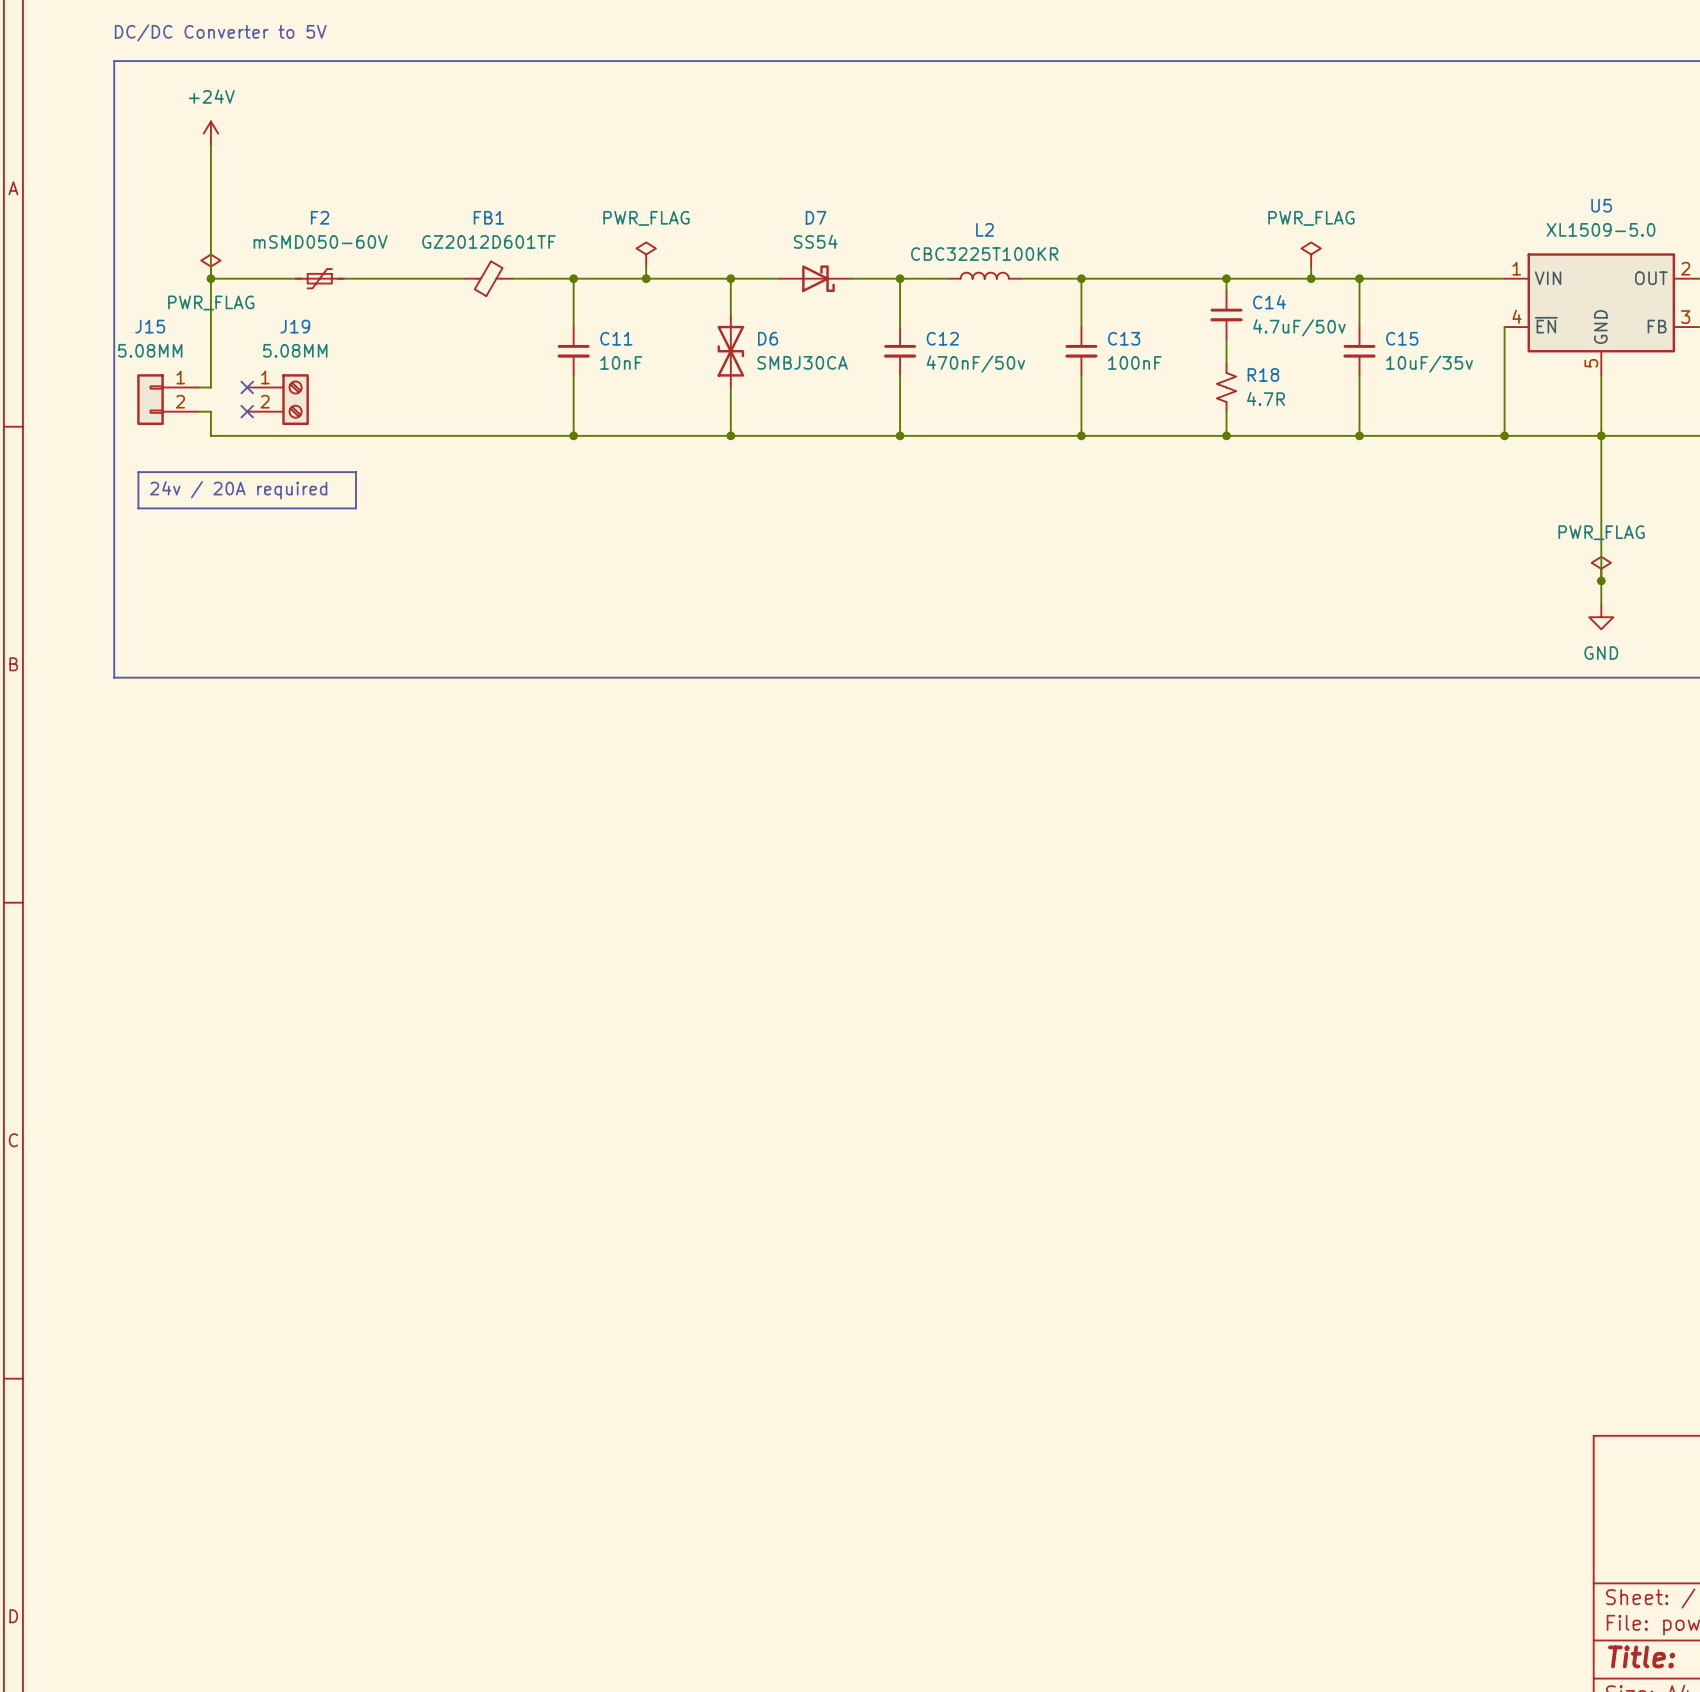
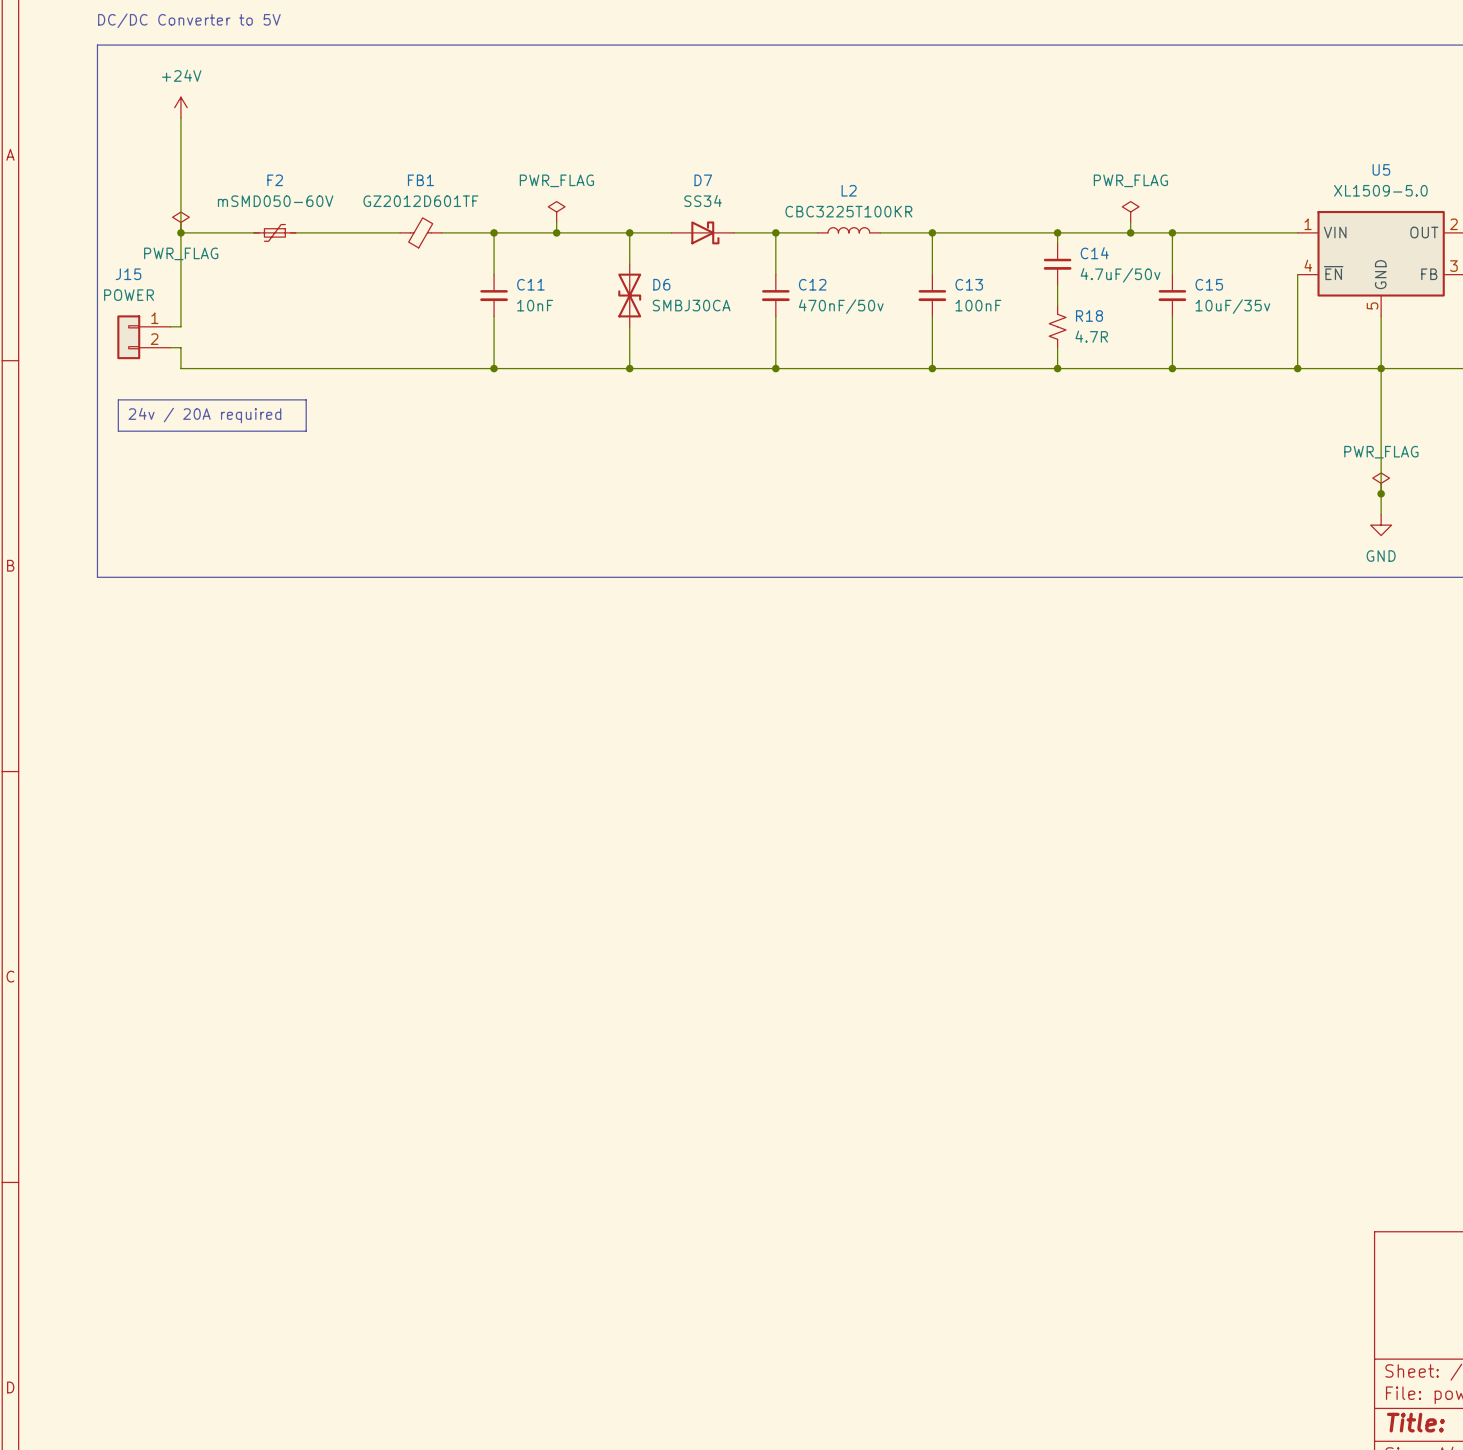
D7 value: SS54 (815, 241) -> SS34 (703, 200)
J15 value: 5.08MM (150, 350) -> POWER (129, 295)
no-connect mark: (247, 387) -> none
J19: 5.08MM (278, 399) -> none
no-connect mark: (247, 411) -> none

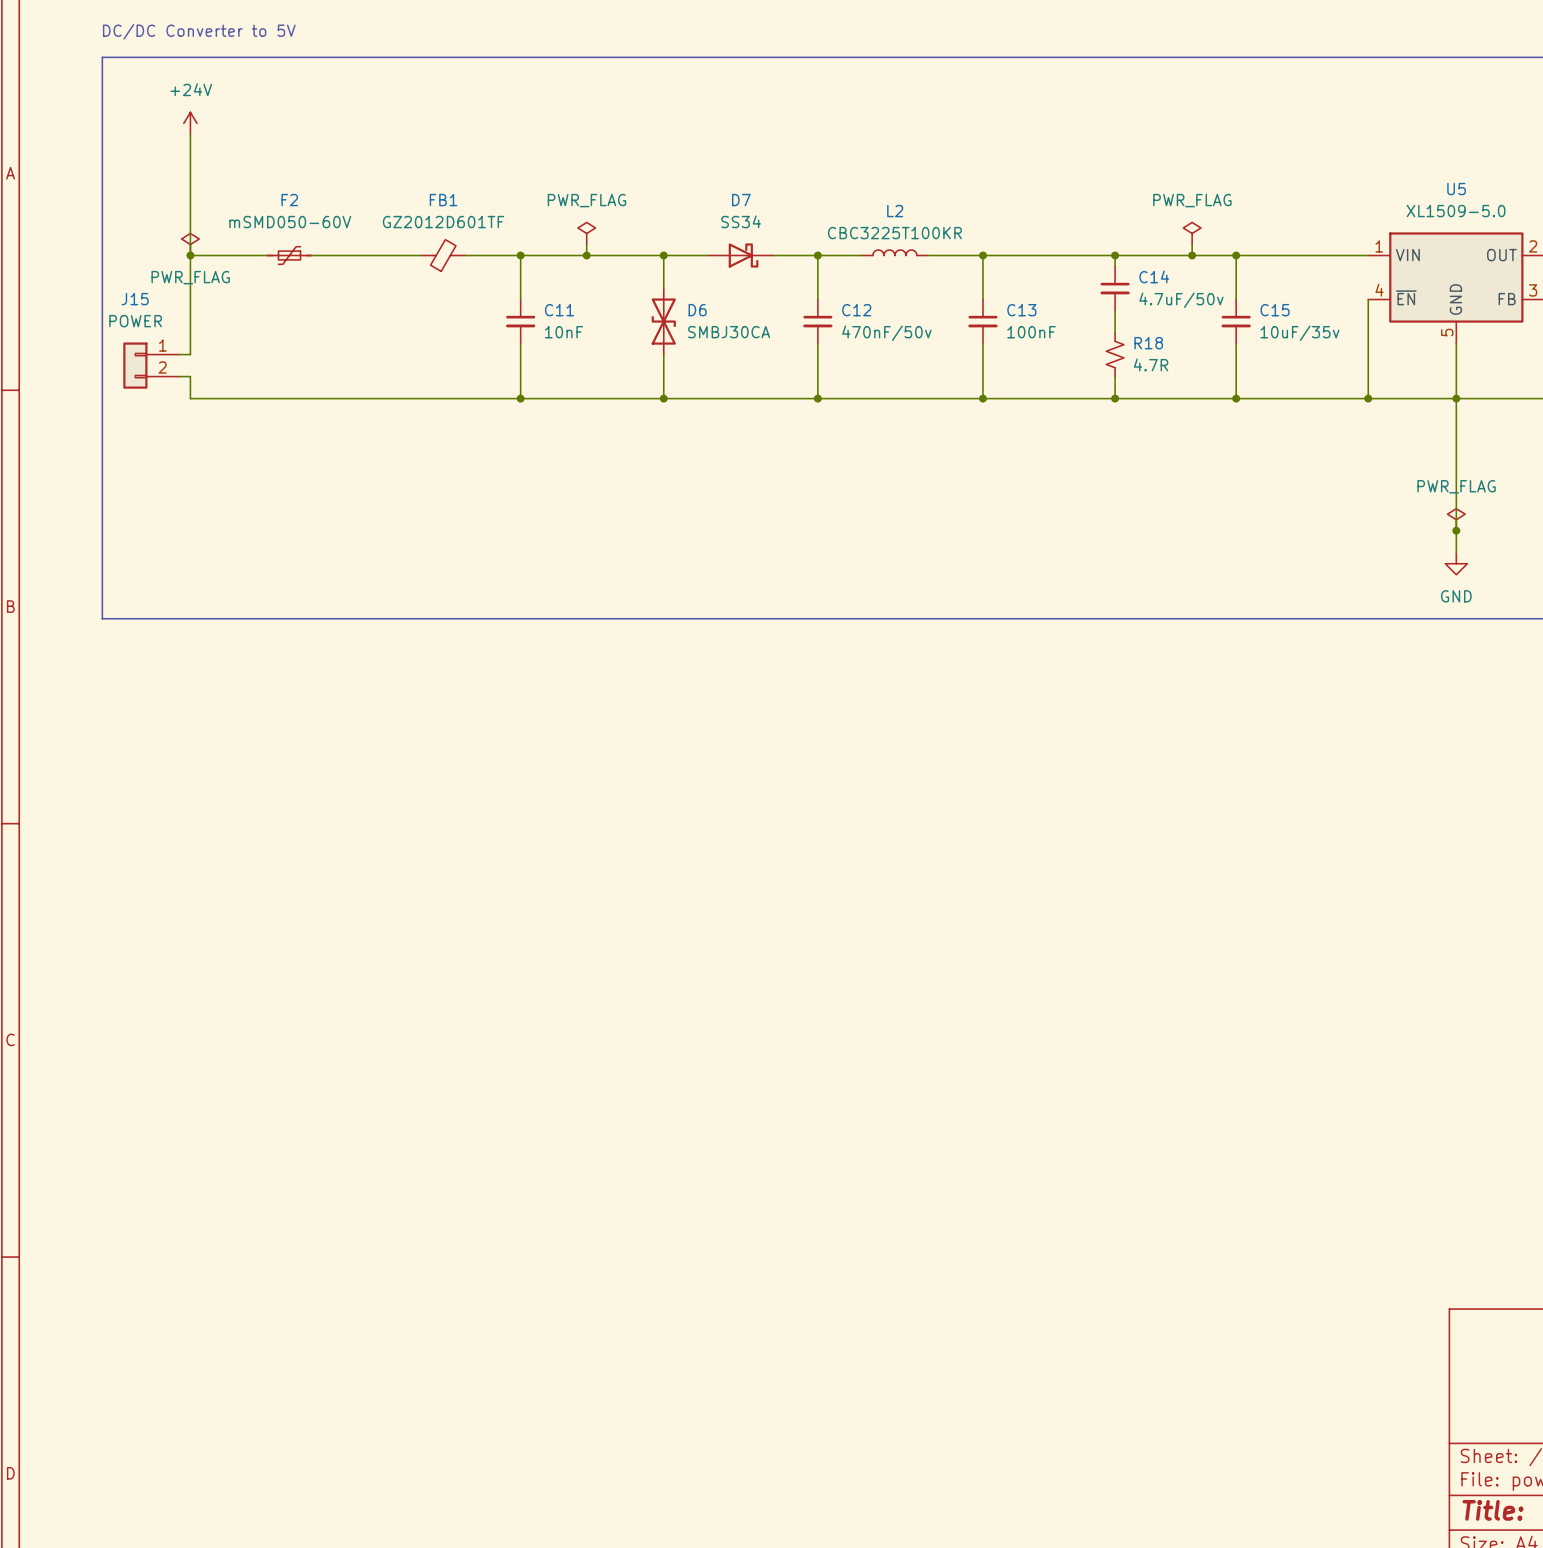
line: (118, 399) (306, 399) (306, 431) (118, 431) (118, 399) -> none
text: 24v / 20A required (204, 415) -> none

